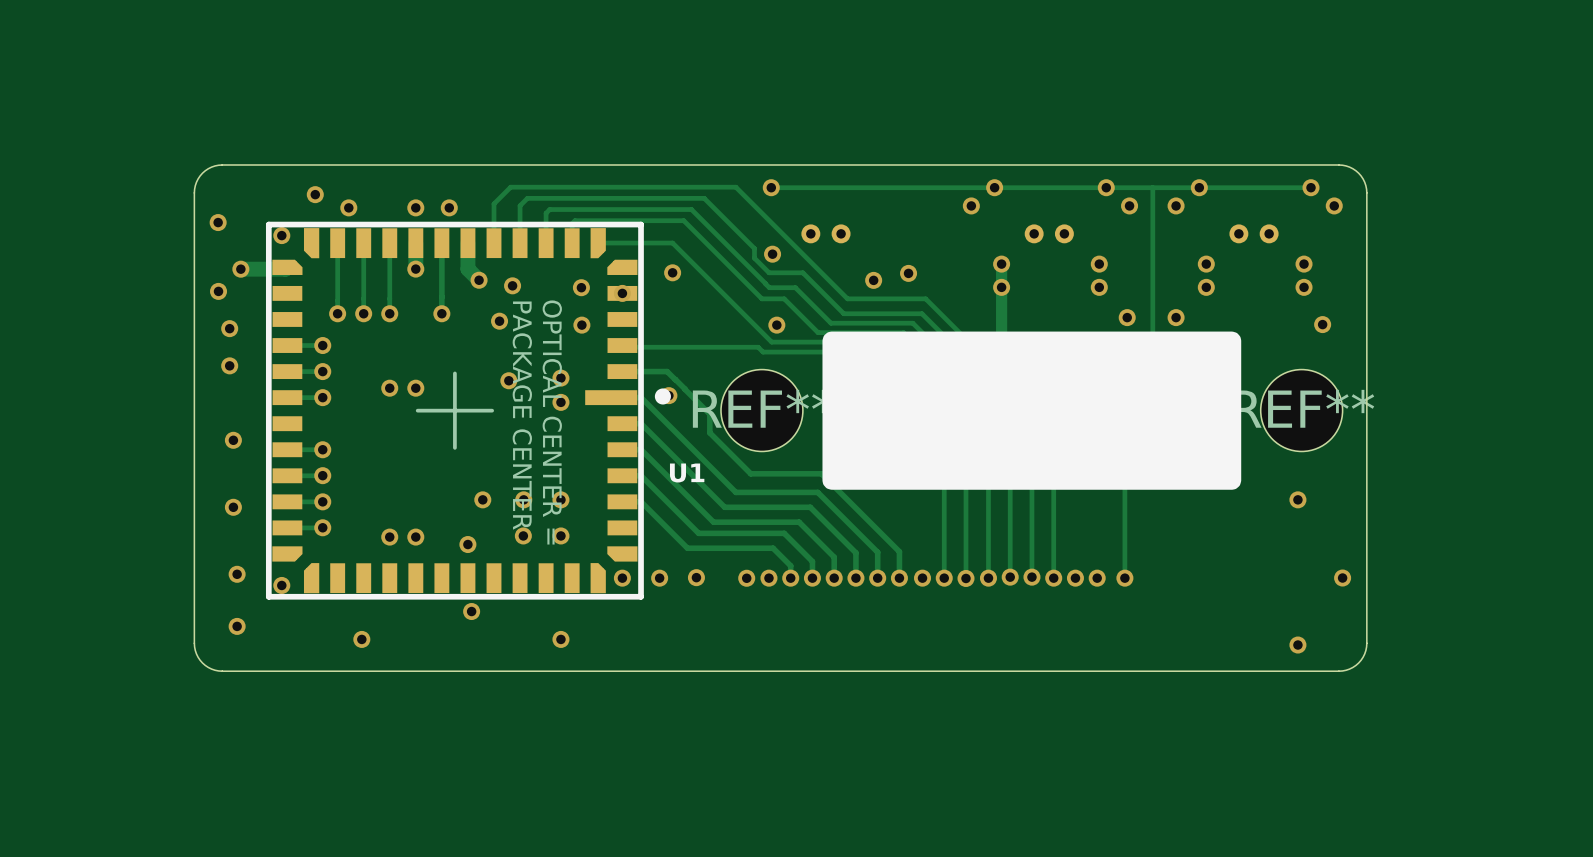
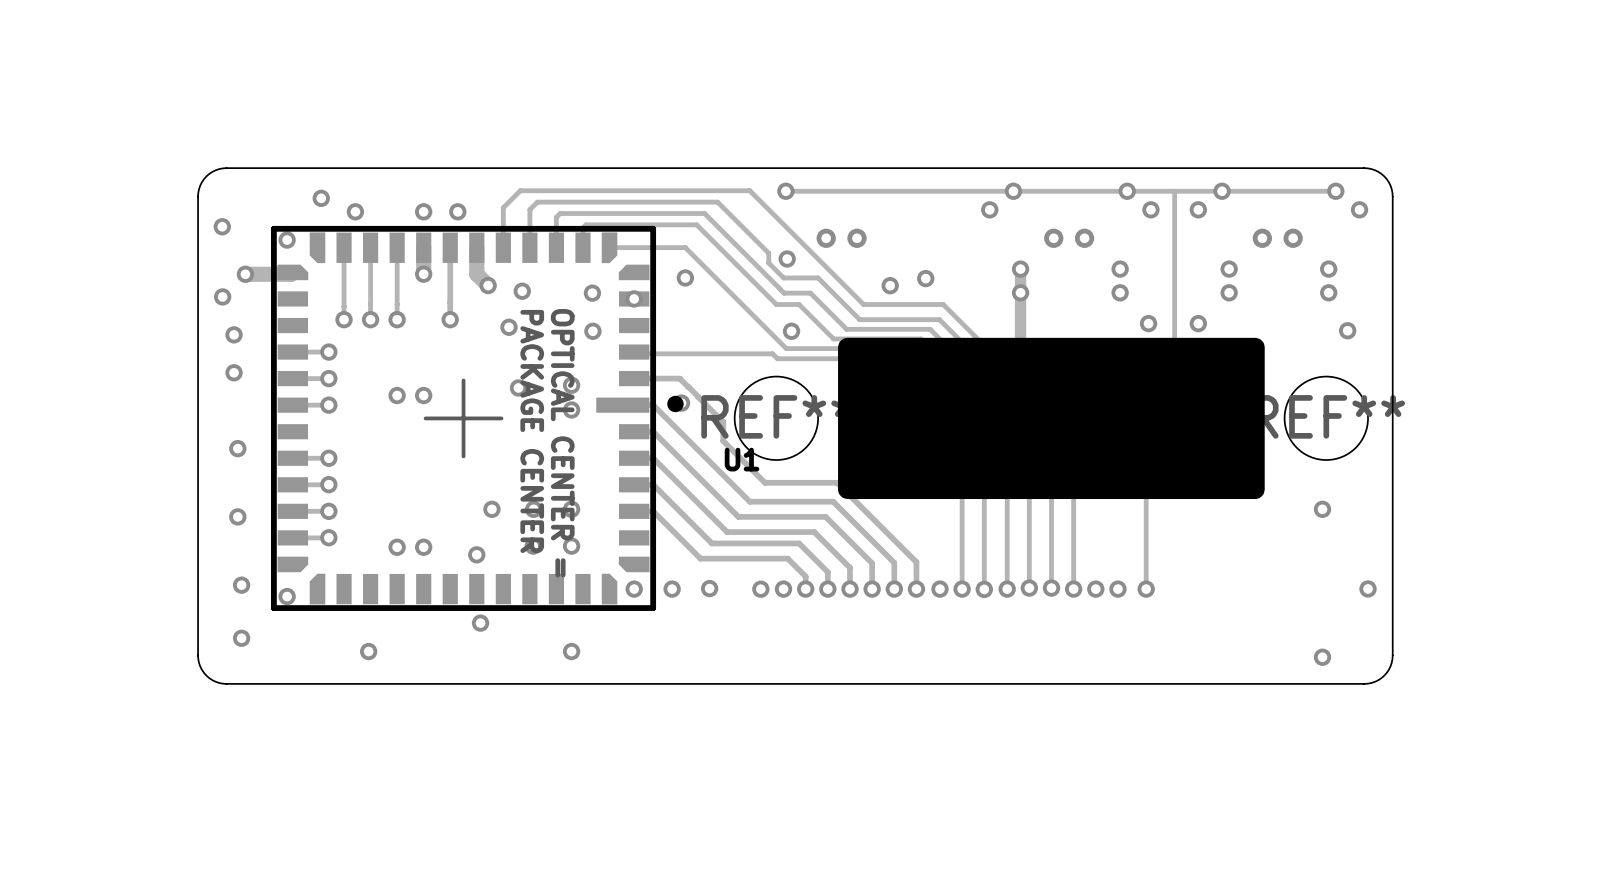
U1 name position: U1 (687, 473) -> U1 (742, 459)

